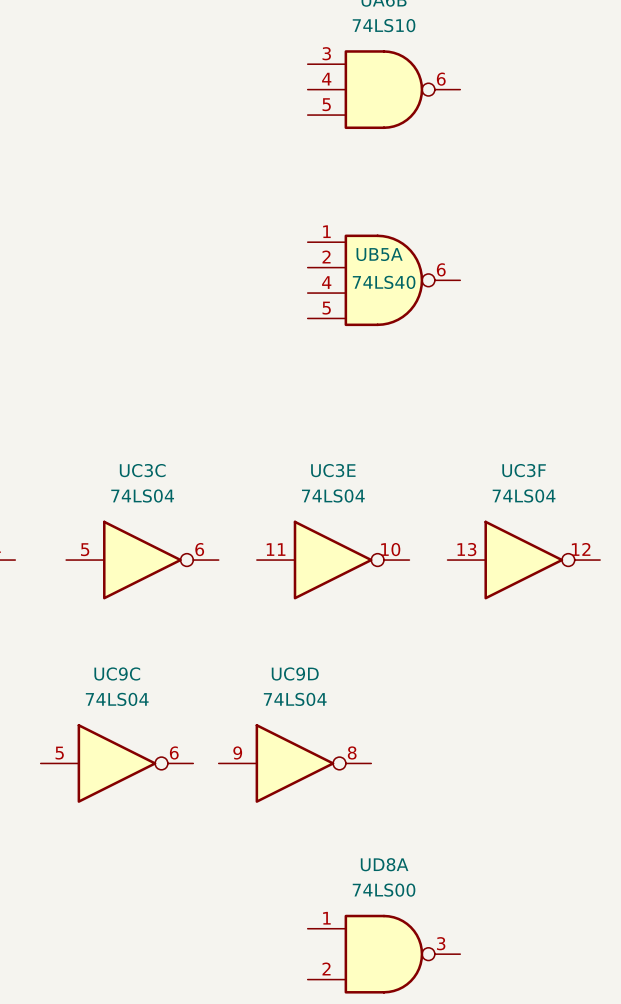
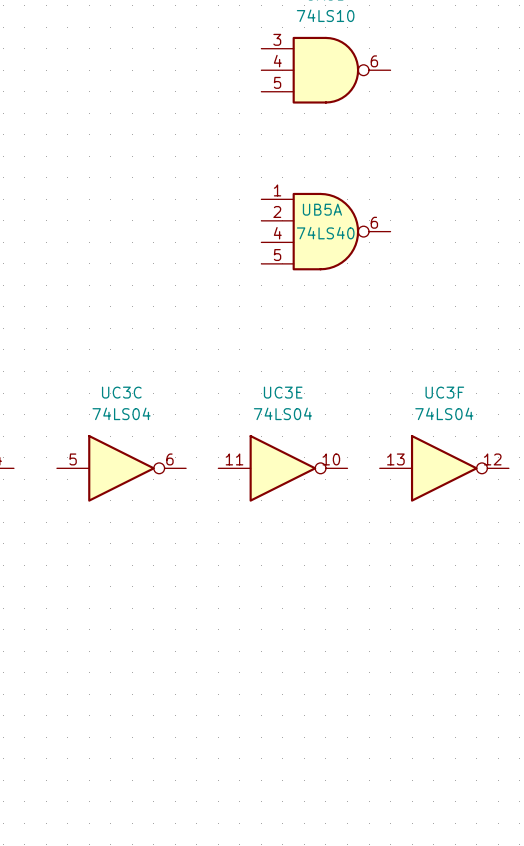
UC9C: 74LS04 (117, 763) -> none
UC9D: 74LS04 (294, 763) -> none
UD8A: 74LS00 (383, 954) -> none

